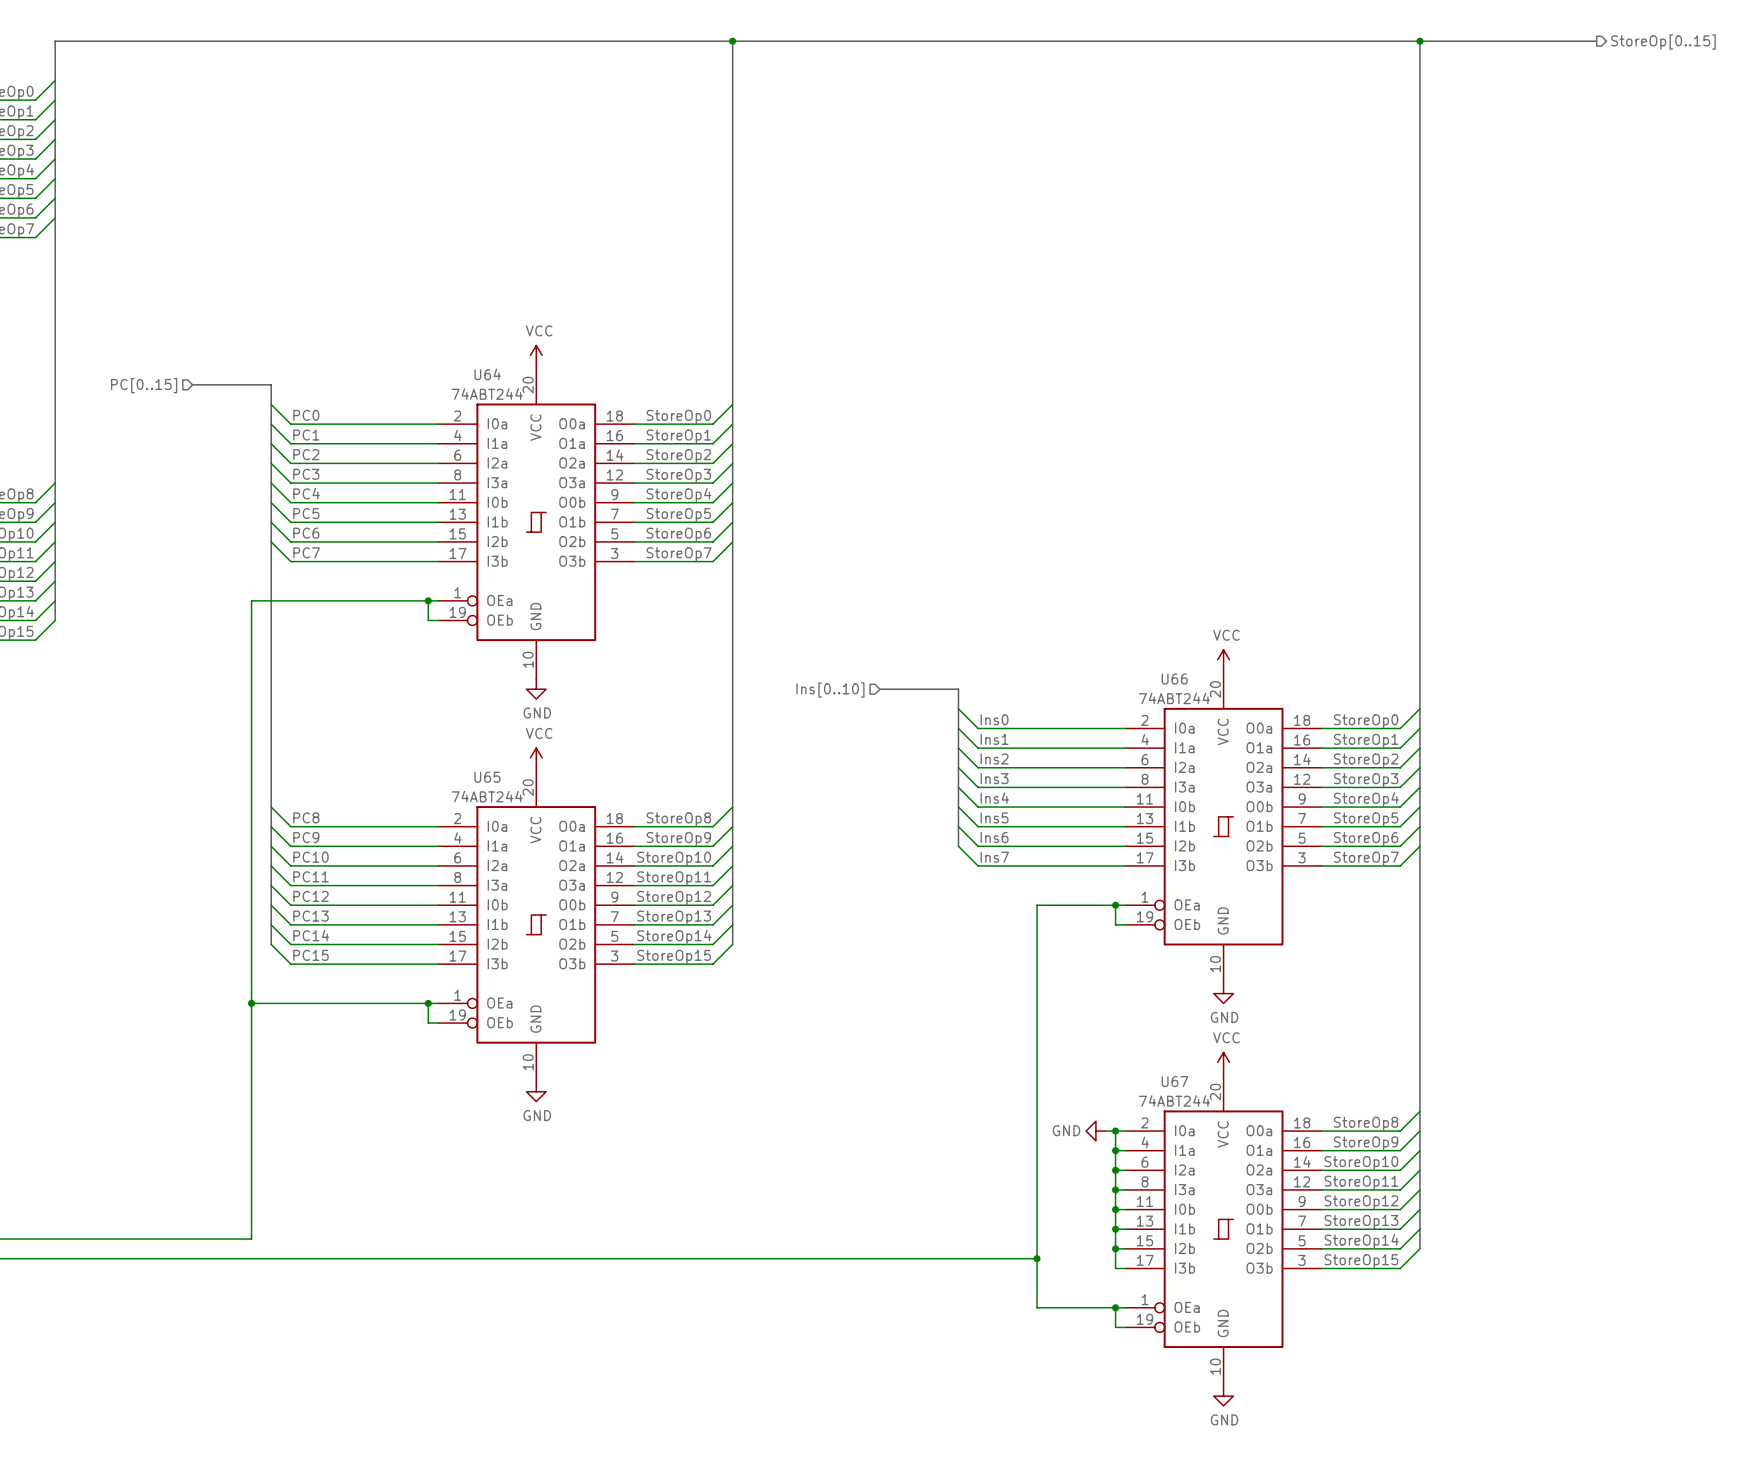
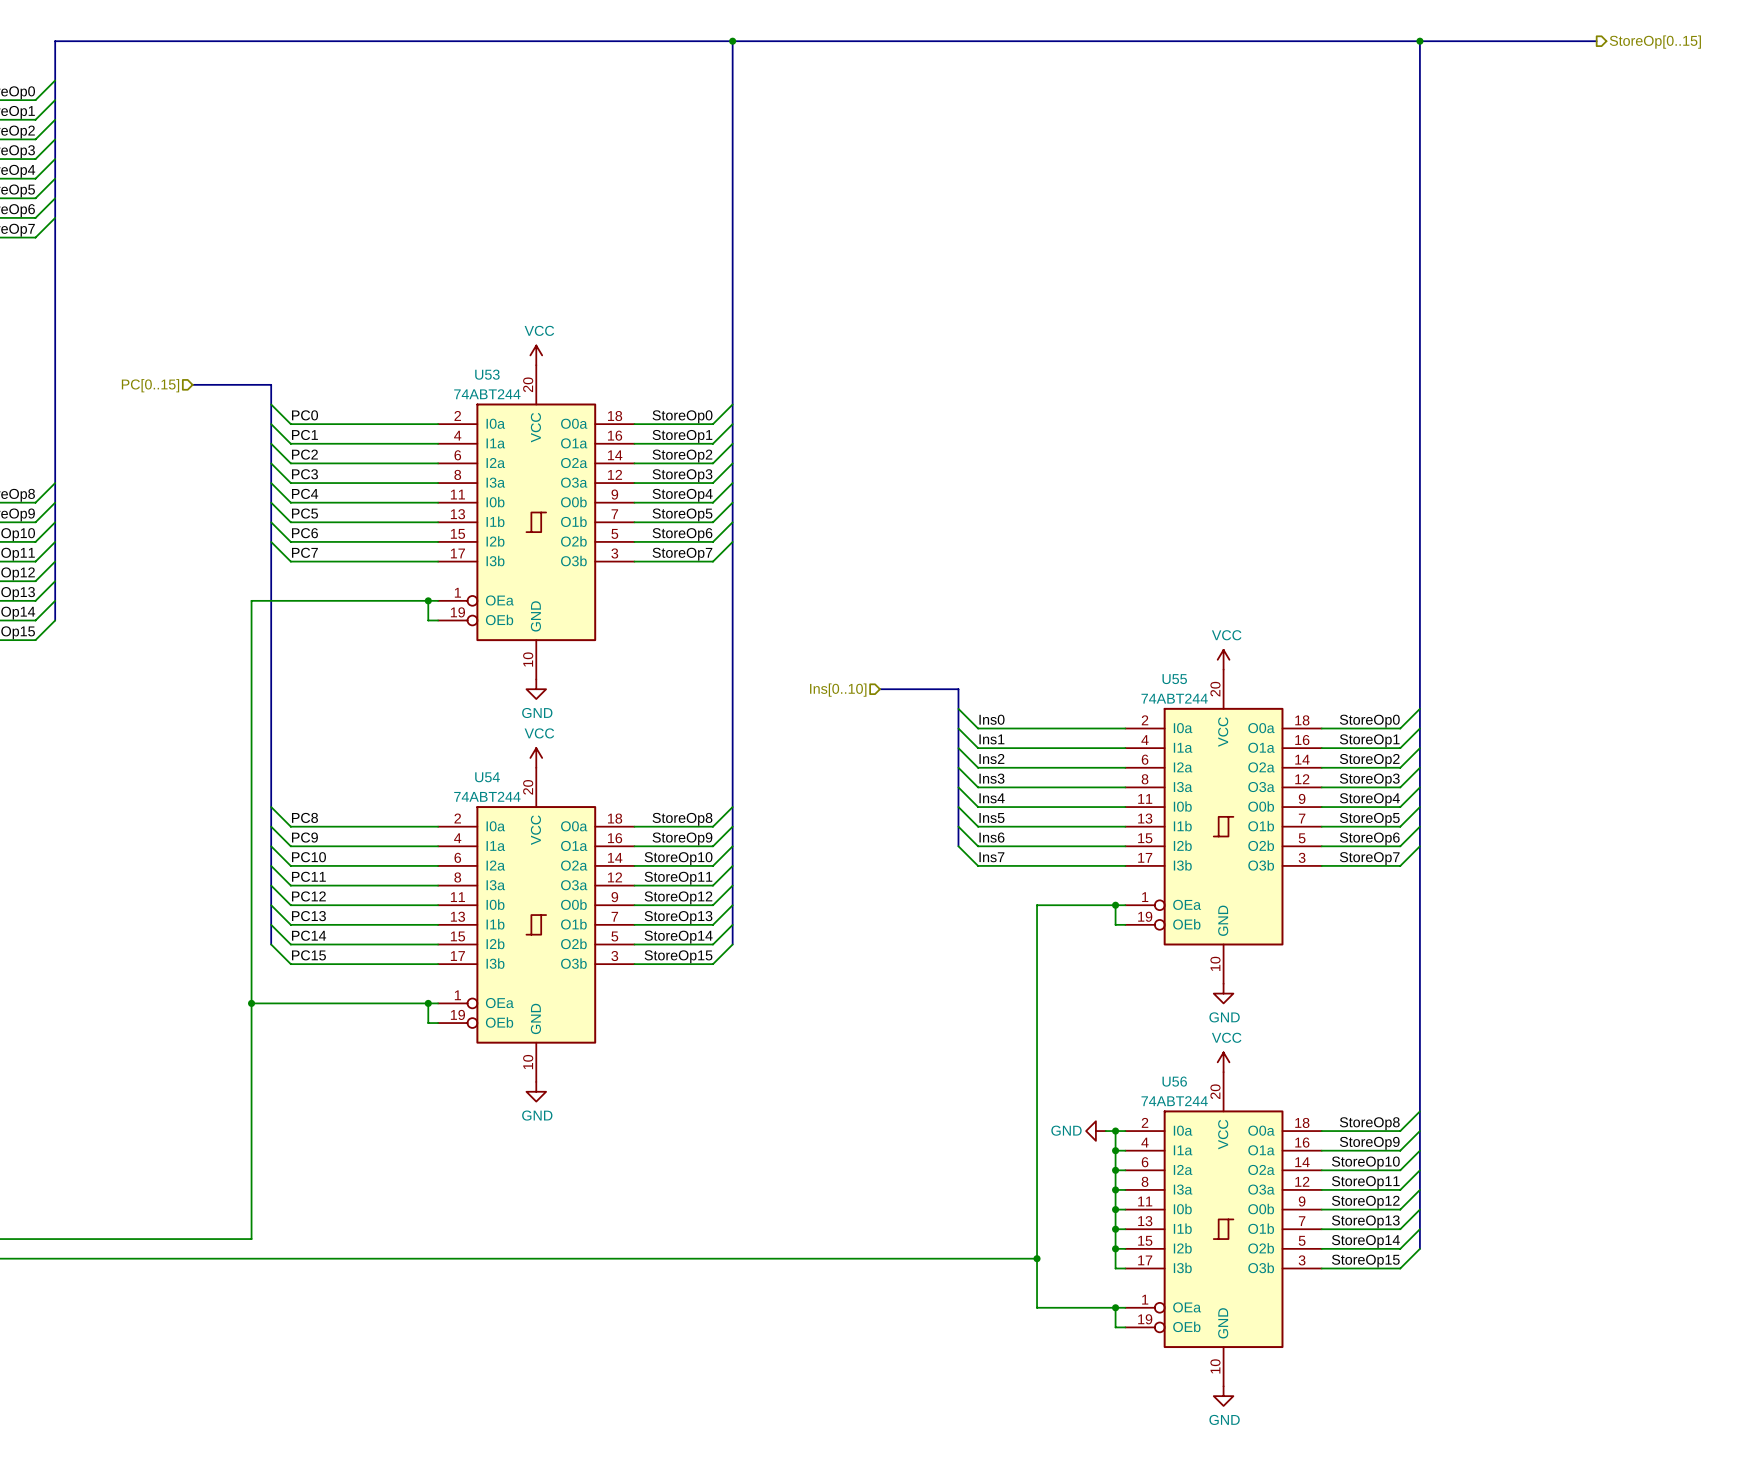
U64 name: U64 (487, 374) -> U53 (487, 374)
U66 name: U66 (1174, 679) -> U55 (1174, 679)
U65 name: U65 (487, 777) -> U54 (487, 777)
U67 name: U67 (1174, 1081) -> U56 (1174, 1081)

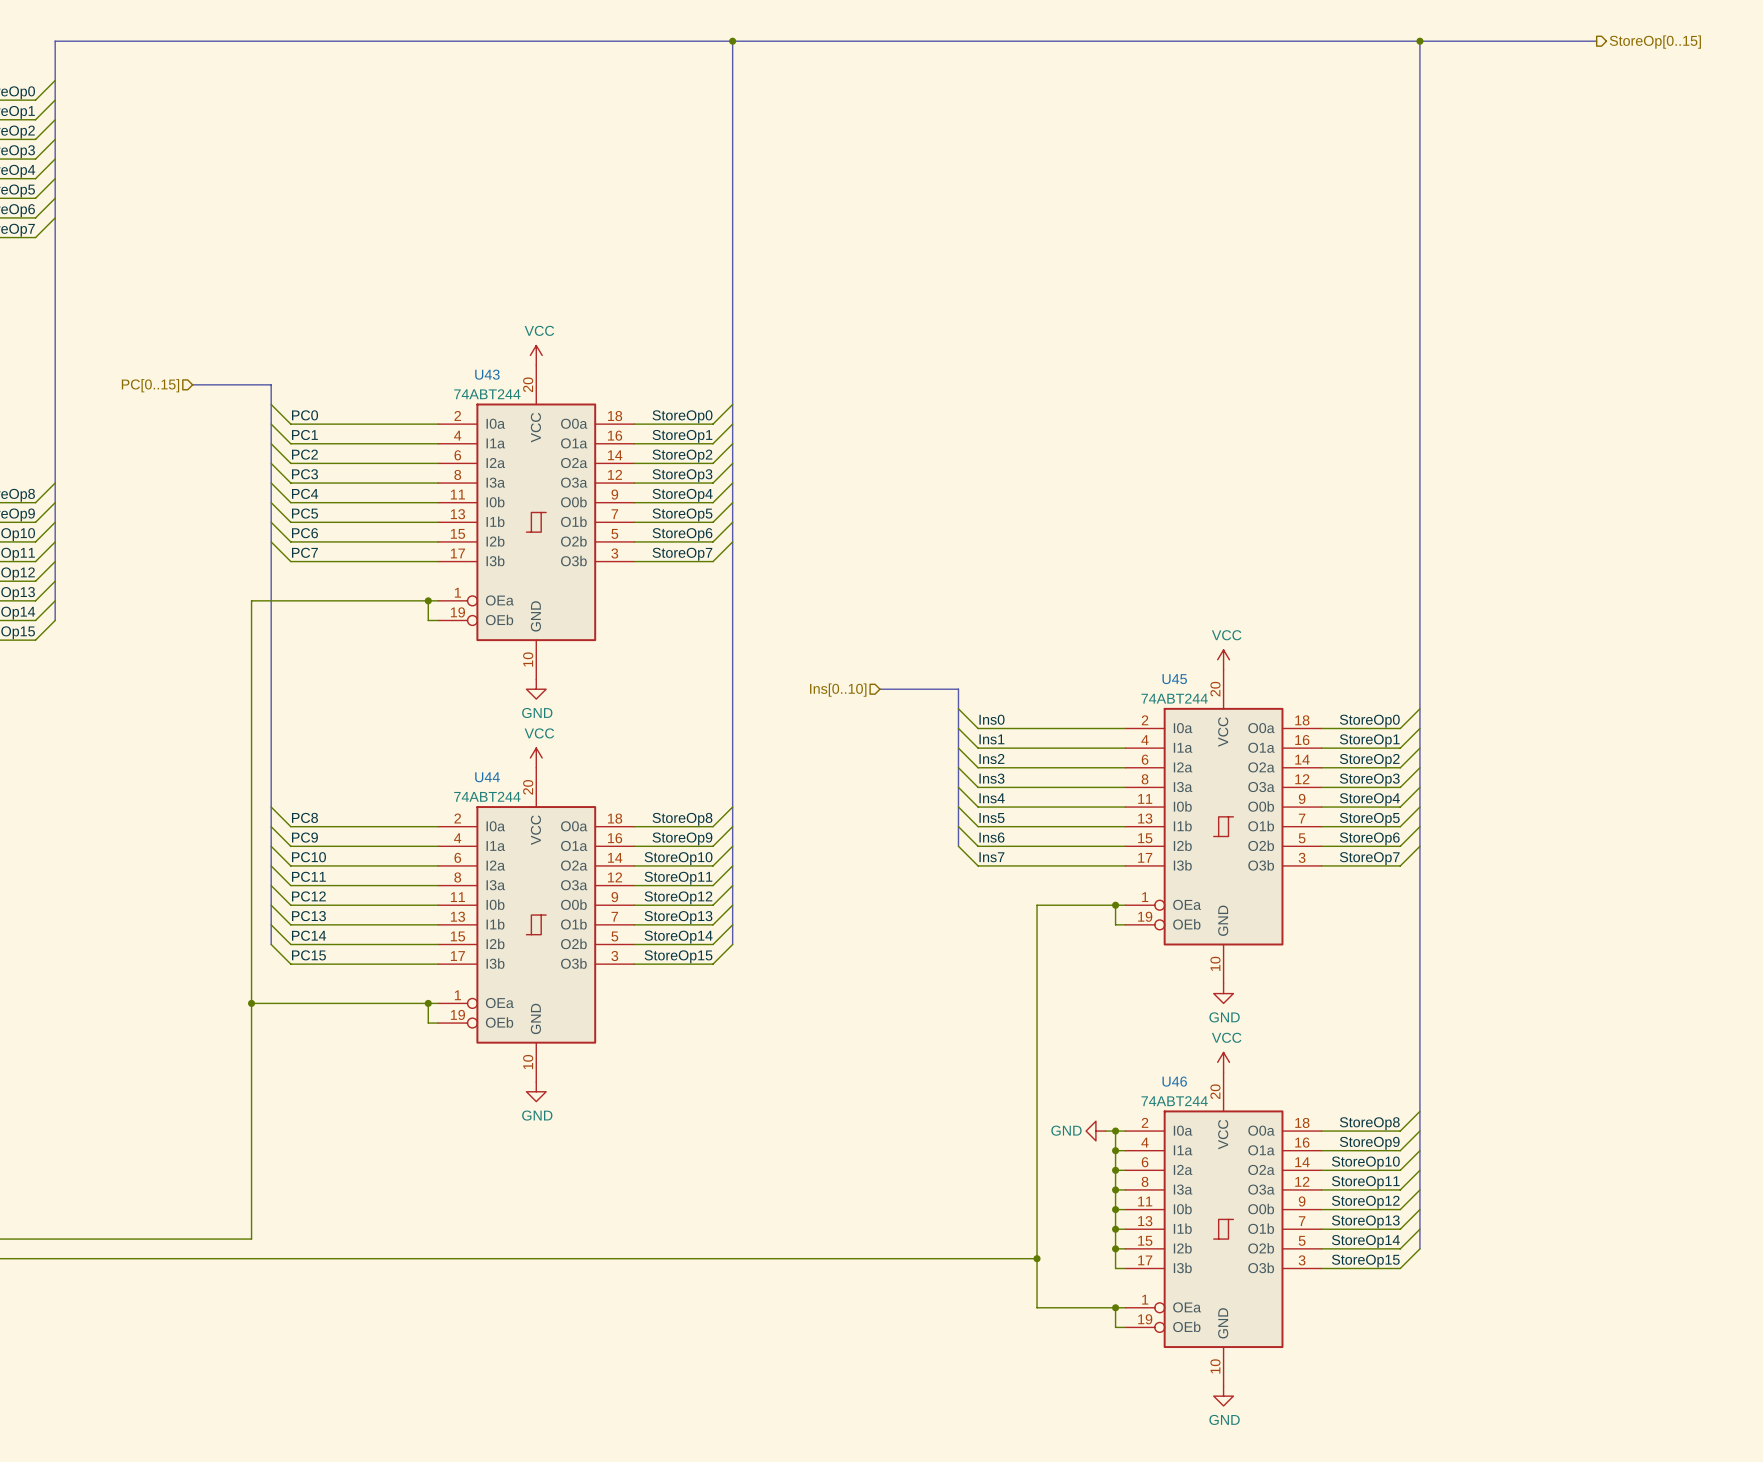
U53 name: U53 (487, 374) -> U43 (487, 374)
U55 name: U55 (1174, 679) -> U45 (1174, 679)
U54 name: U54 (487, 777) -> U44 (487, 777)
U56 name: U56 (1174, 1081) -> U46 (1174, 1081)

